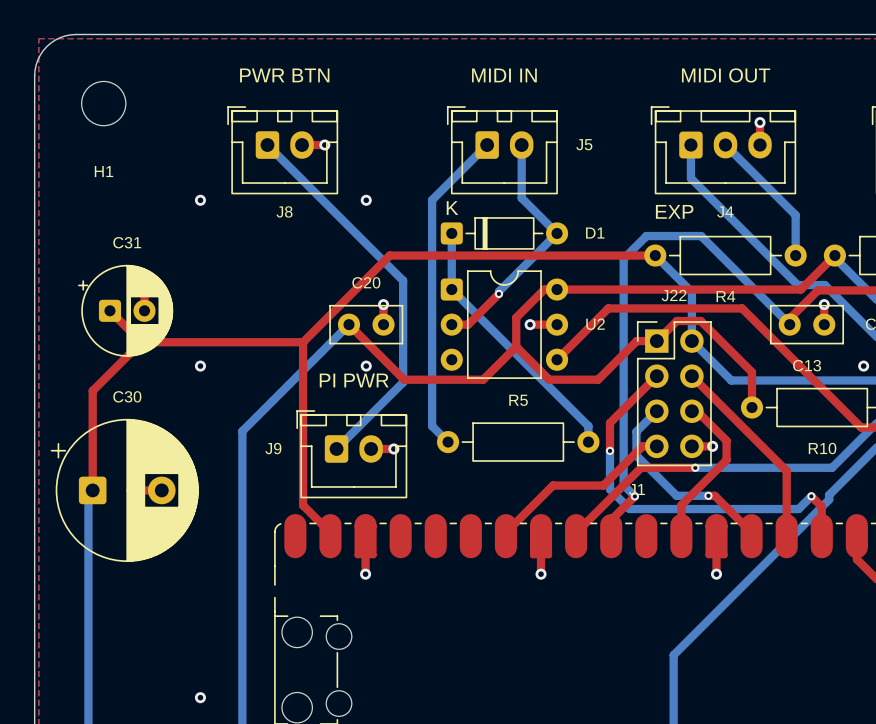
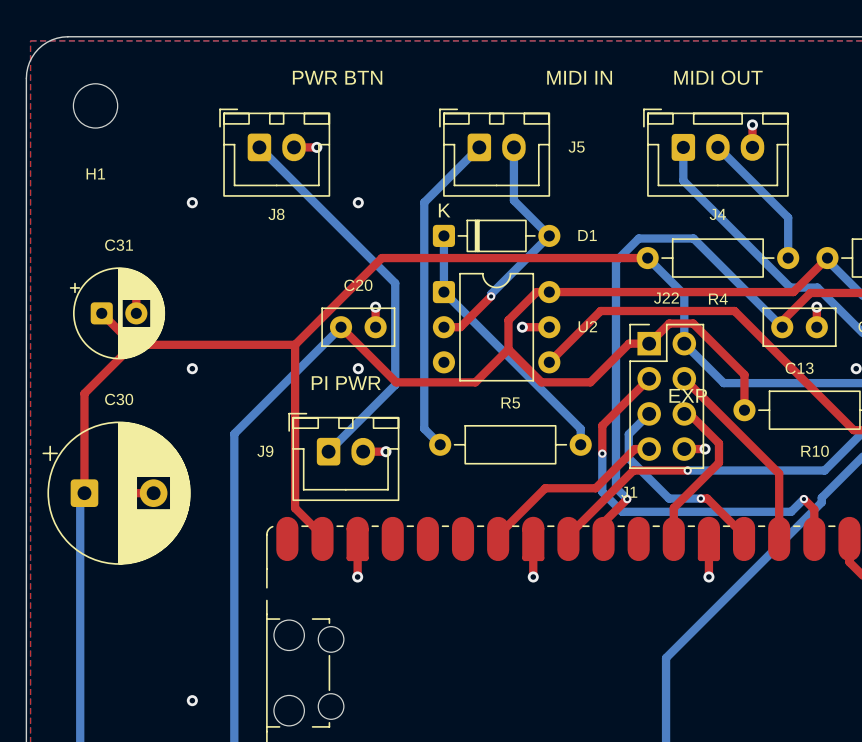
text position: PWR BTN (284, 75) -> PWR BTN (337, 77)
text position: MIDI IN (504, 75) -> MIDI IN (579, 77)
text position: EXP (674, 211) -> EXP (688, 395)

